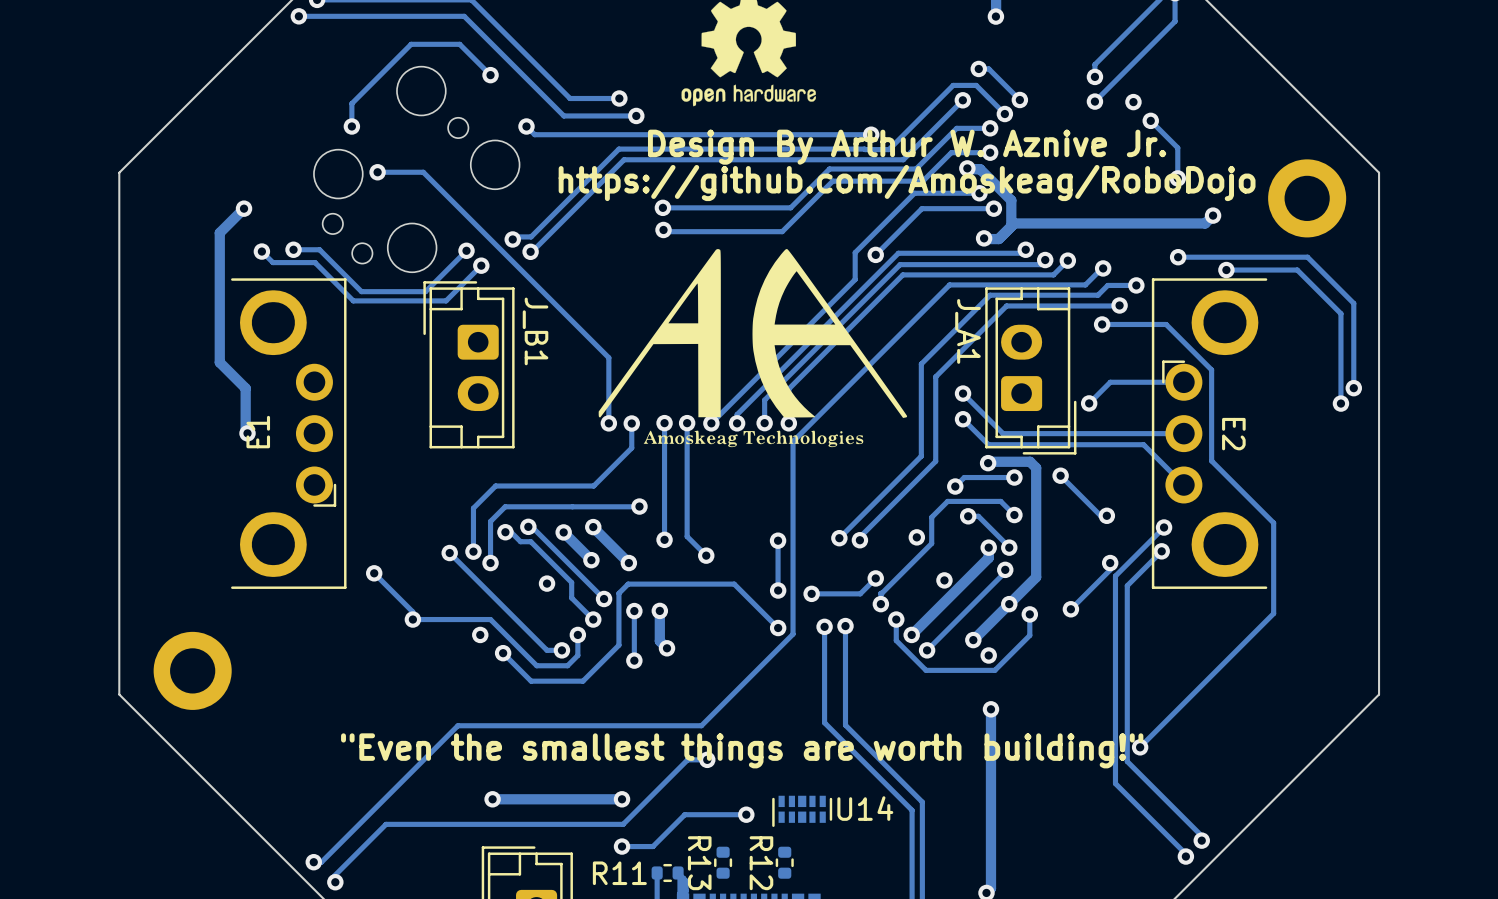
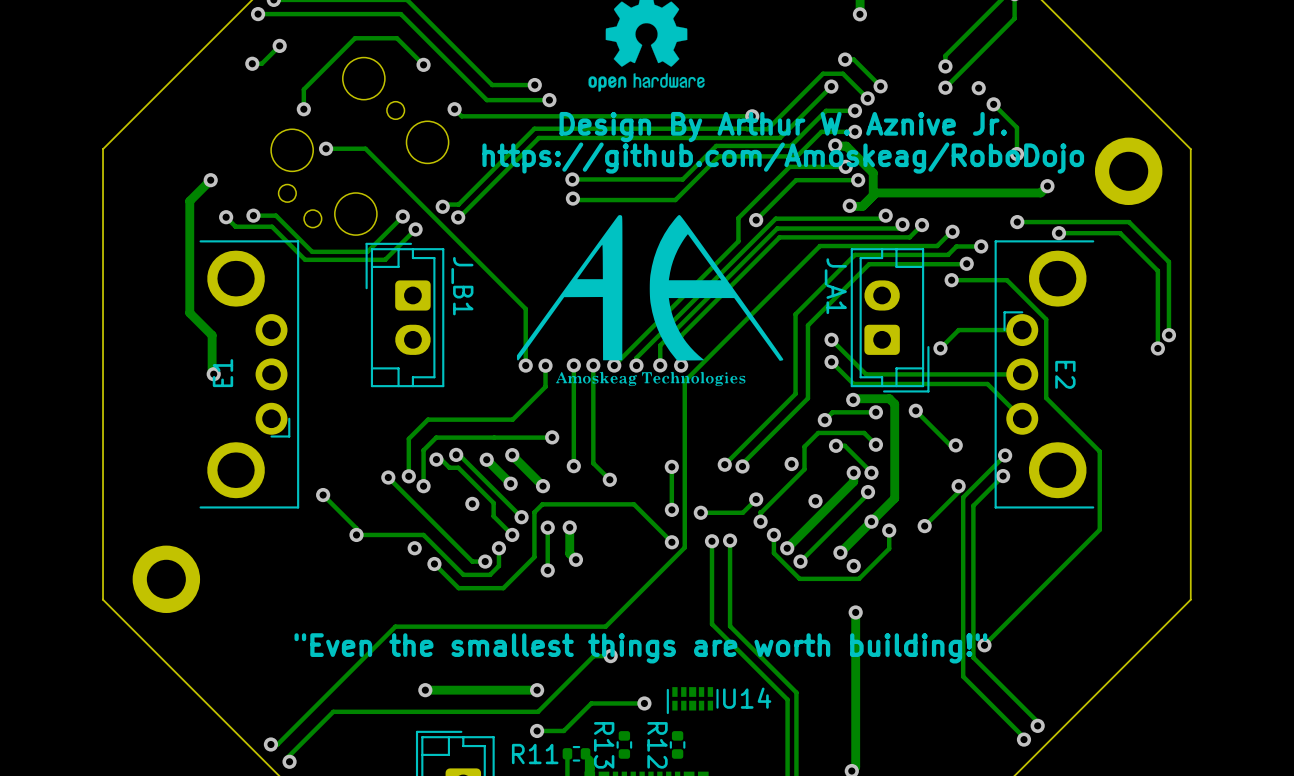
track: none -> (279, 45) (261, 63) (252, 63)
via: none -> (279, 45)
via: none -> (252, 63)

